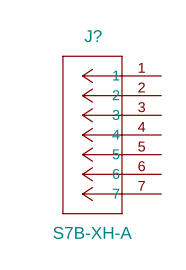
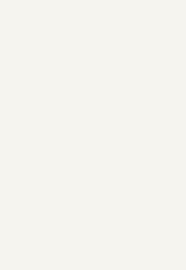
J?: S7B-XH-A (111, 134) -> none

